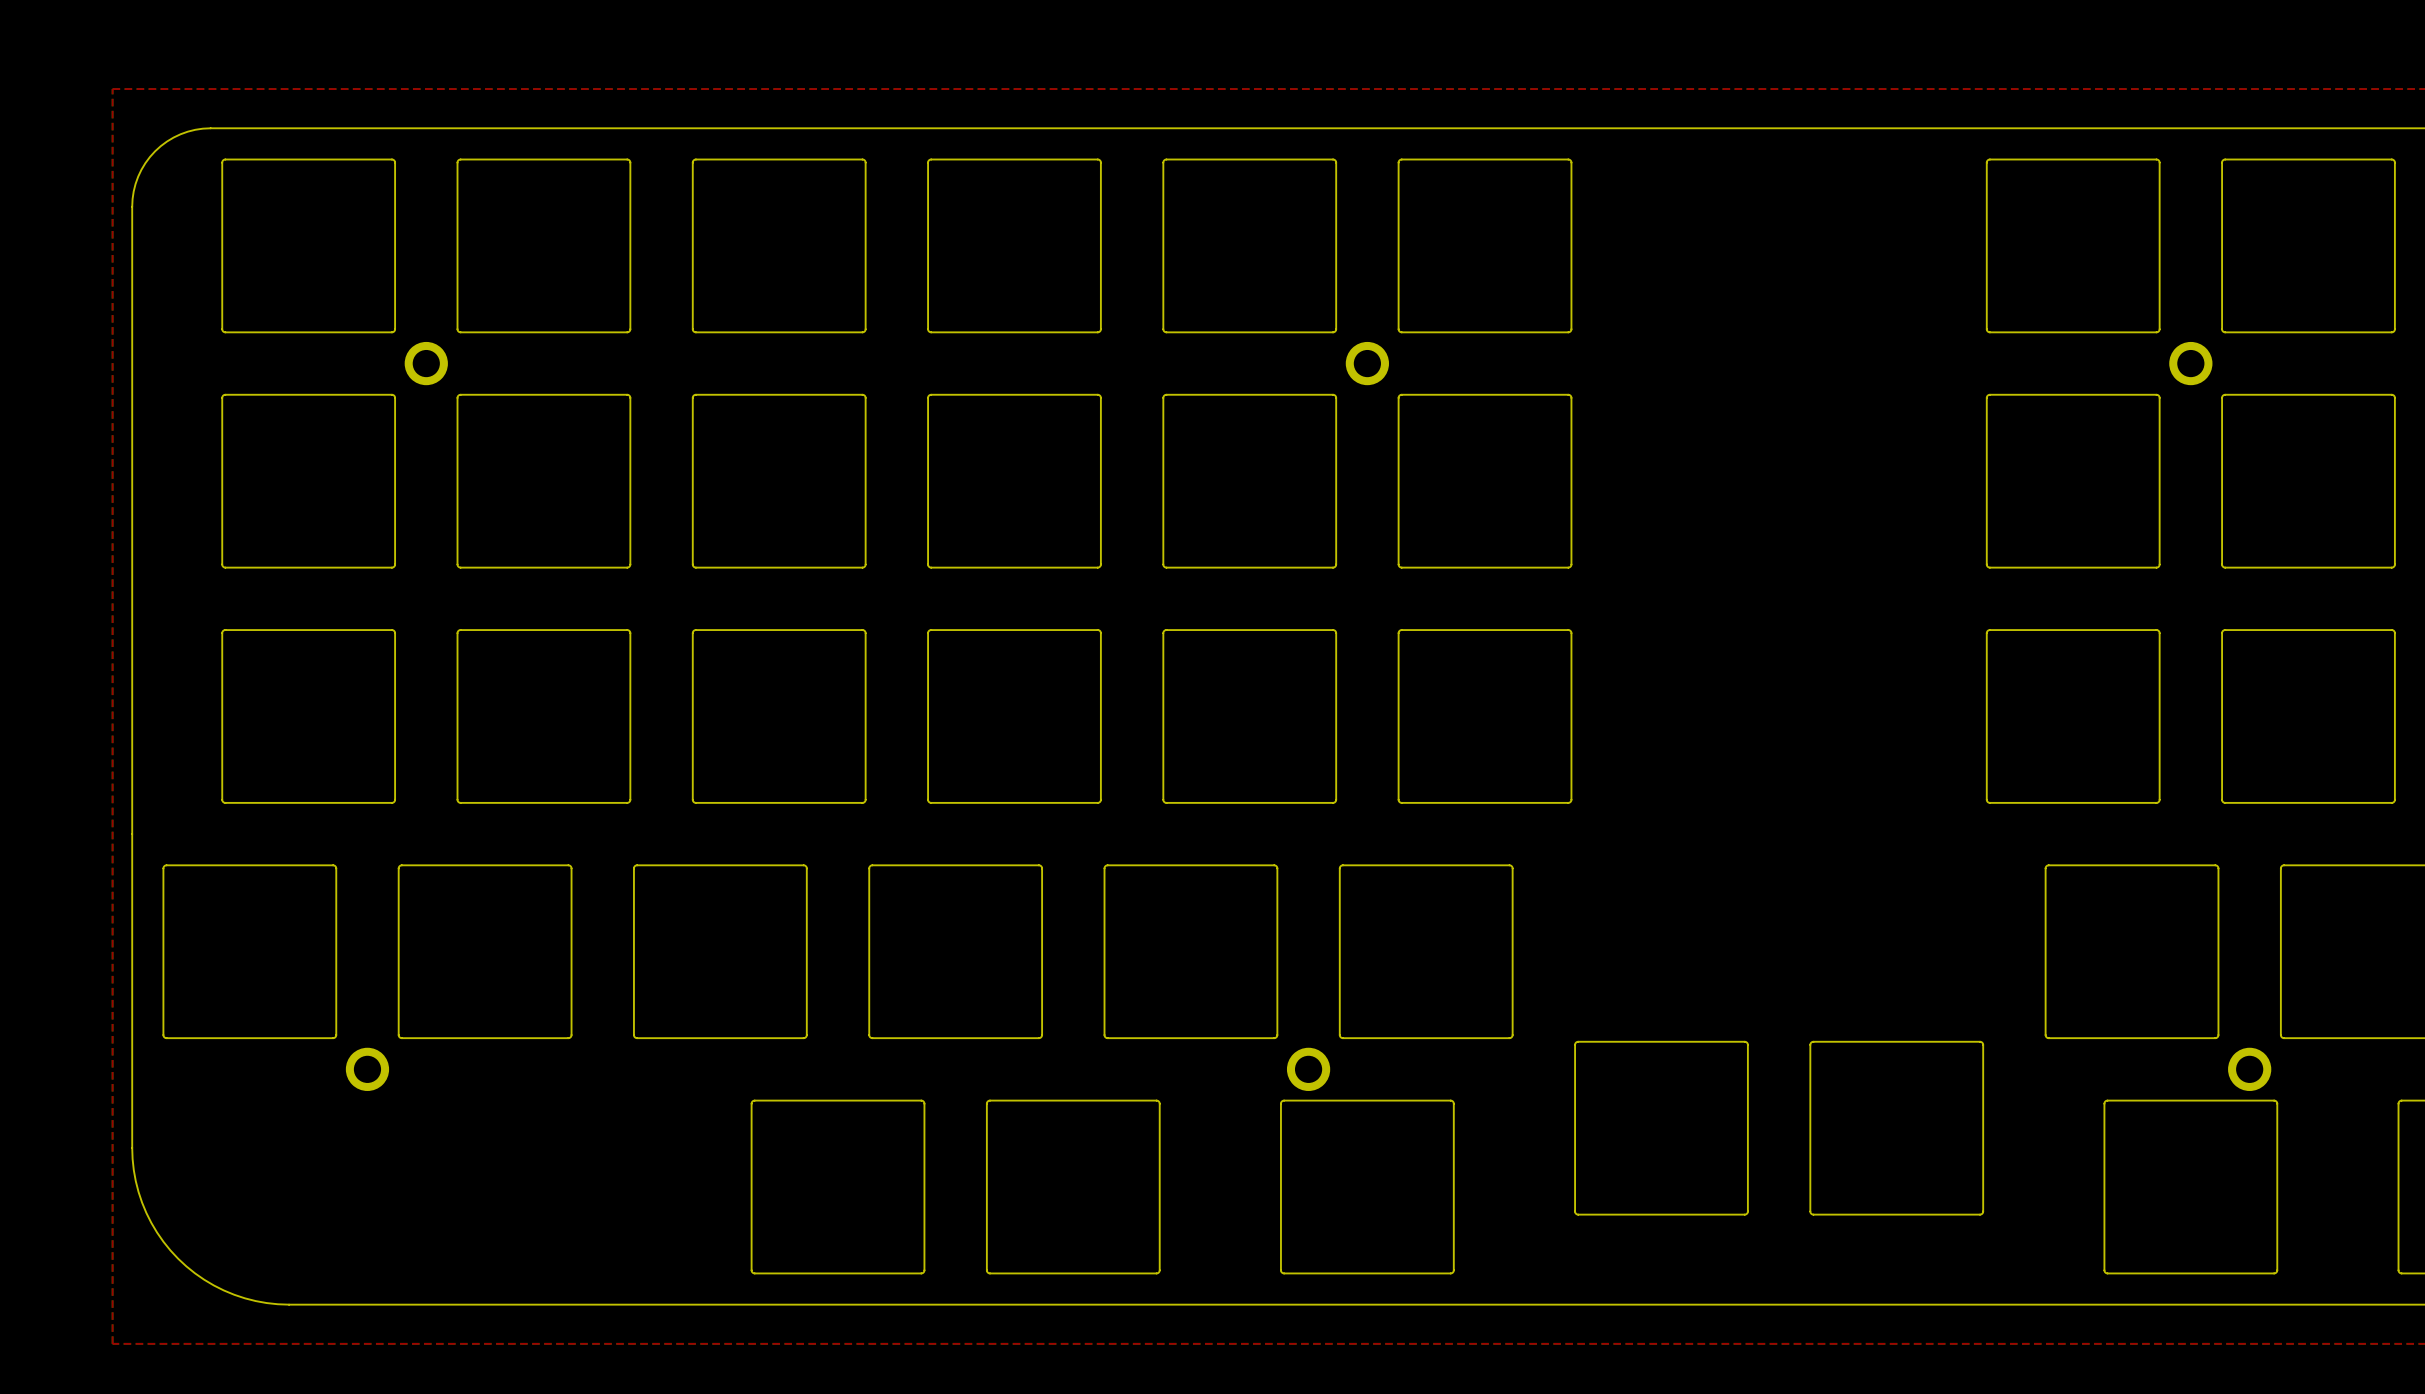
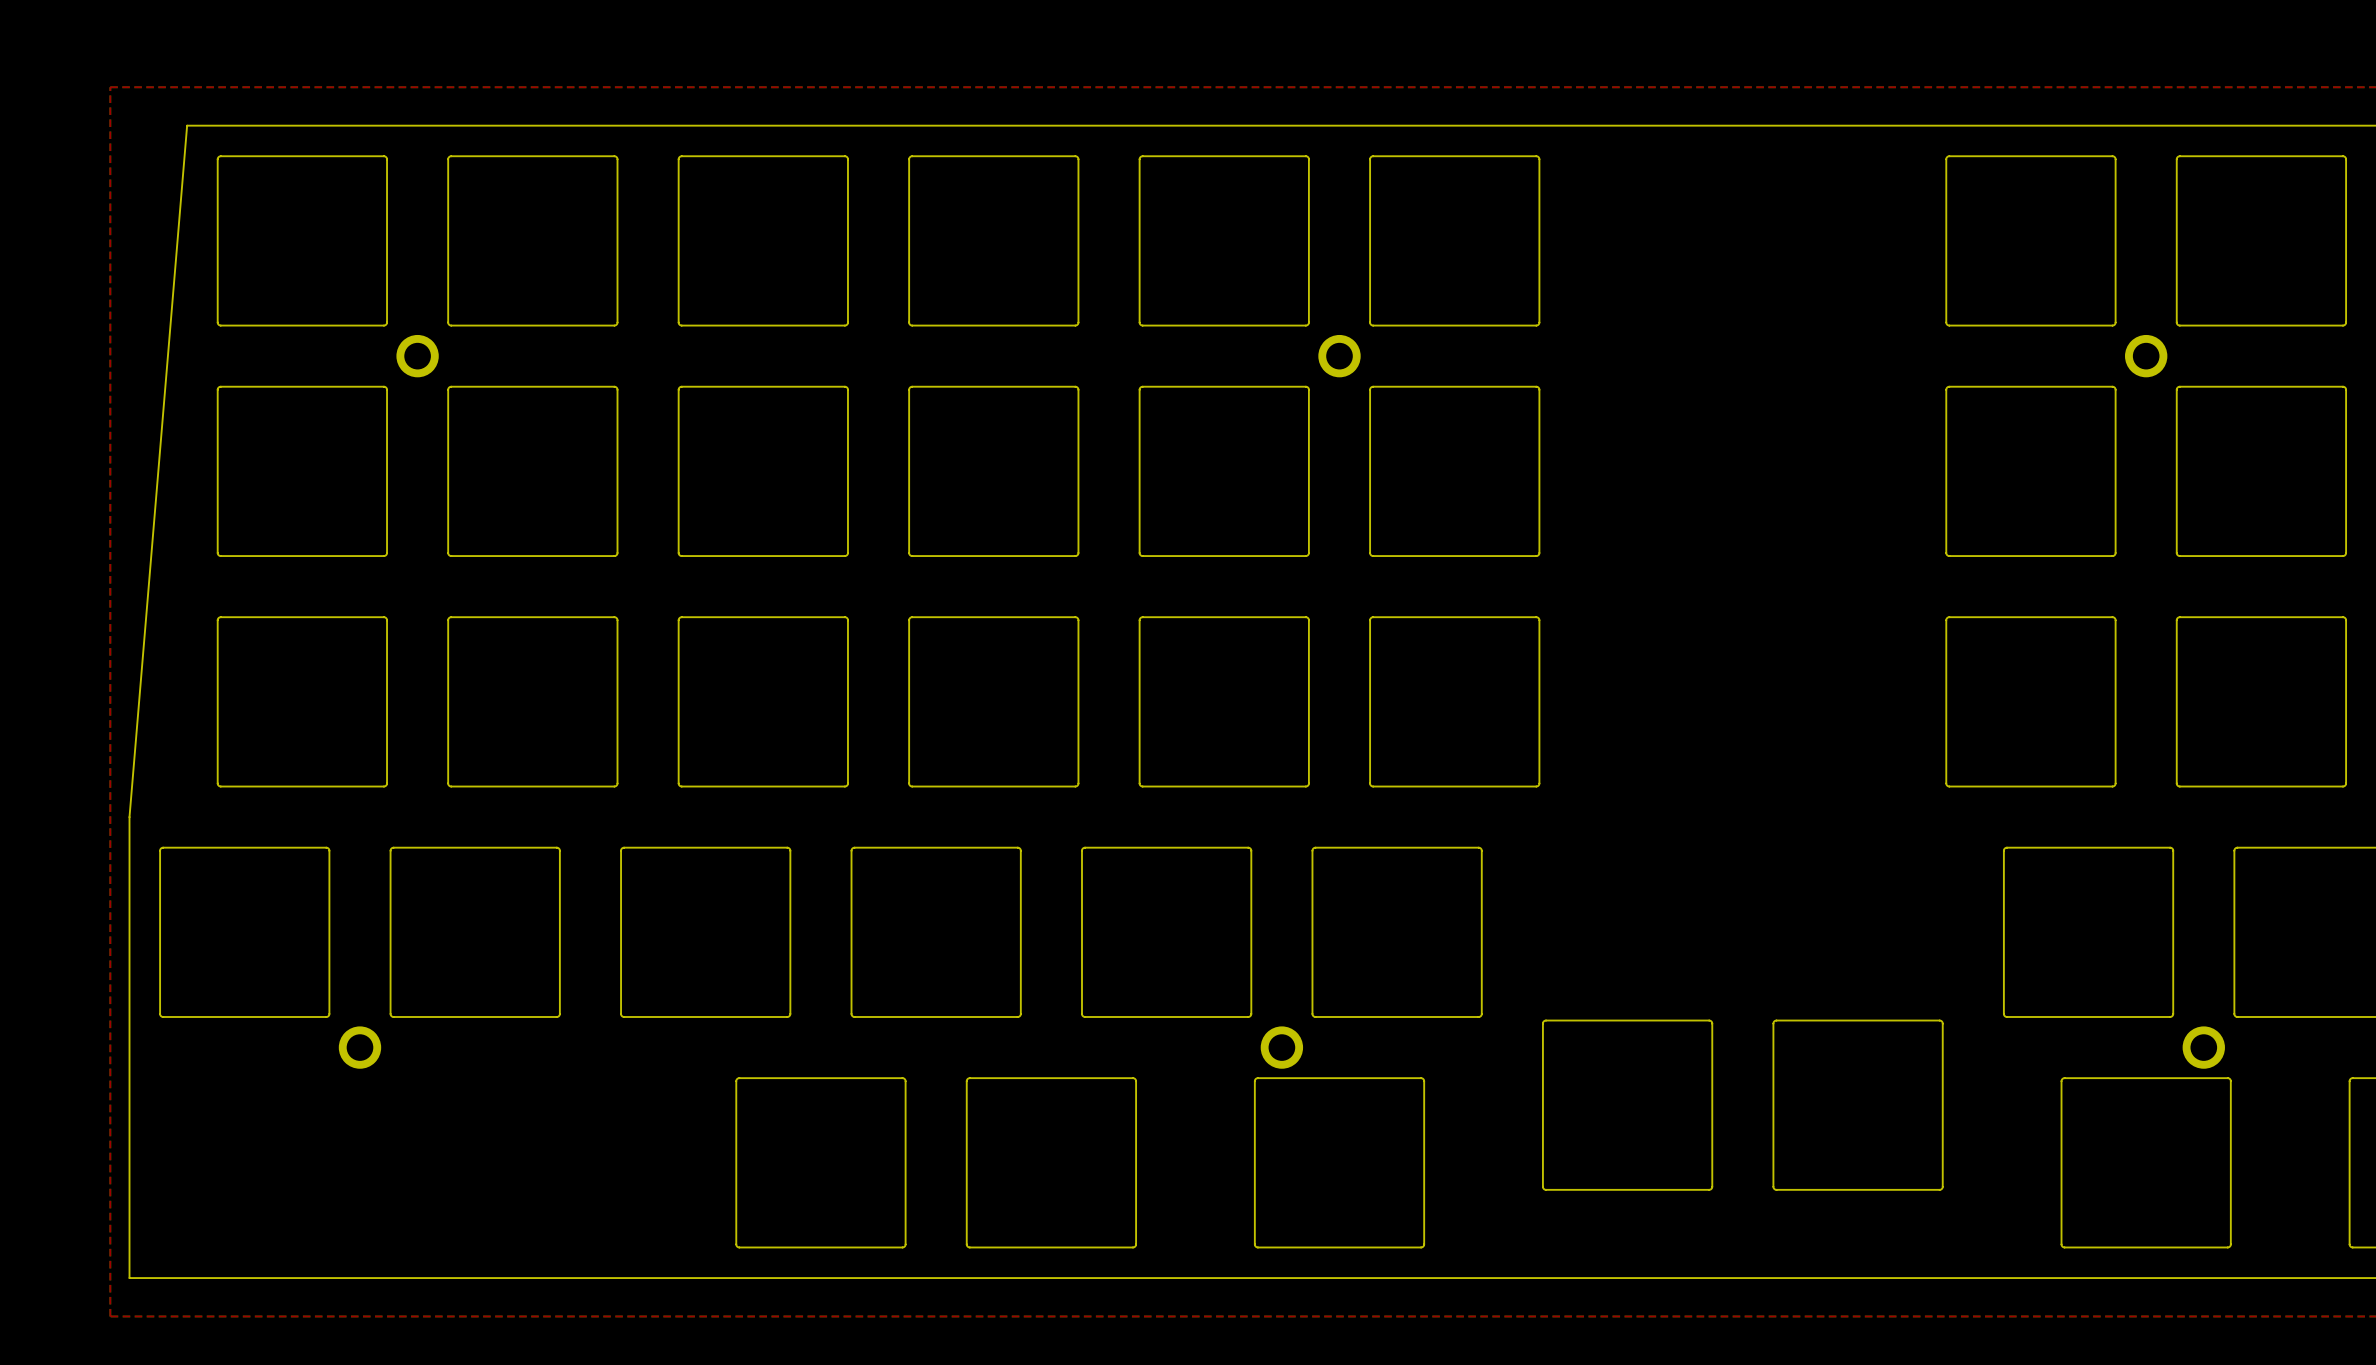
board edge: (210, 128) (187, 131) (173, 137) (160, 146) (150, 156) (141, 169) (135, 183) (132, 199) (132, 834) -> (206, 125) (187, 125) (129, 817)
board edge: (132, 1147) (135, 1181) (142, 1202) (157, 1232) (178, 1258) (204, 1279) (234, 1294) (255, 1301) (289, 1304) -> (129, 1124) (129, 1278) (283, 1278)

